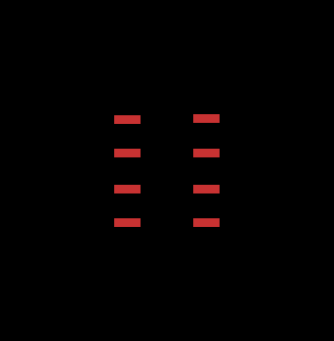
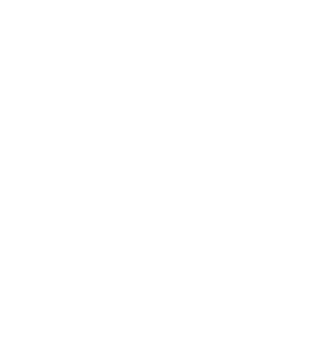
part: (166, 170) -> none

